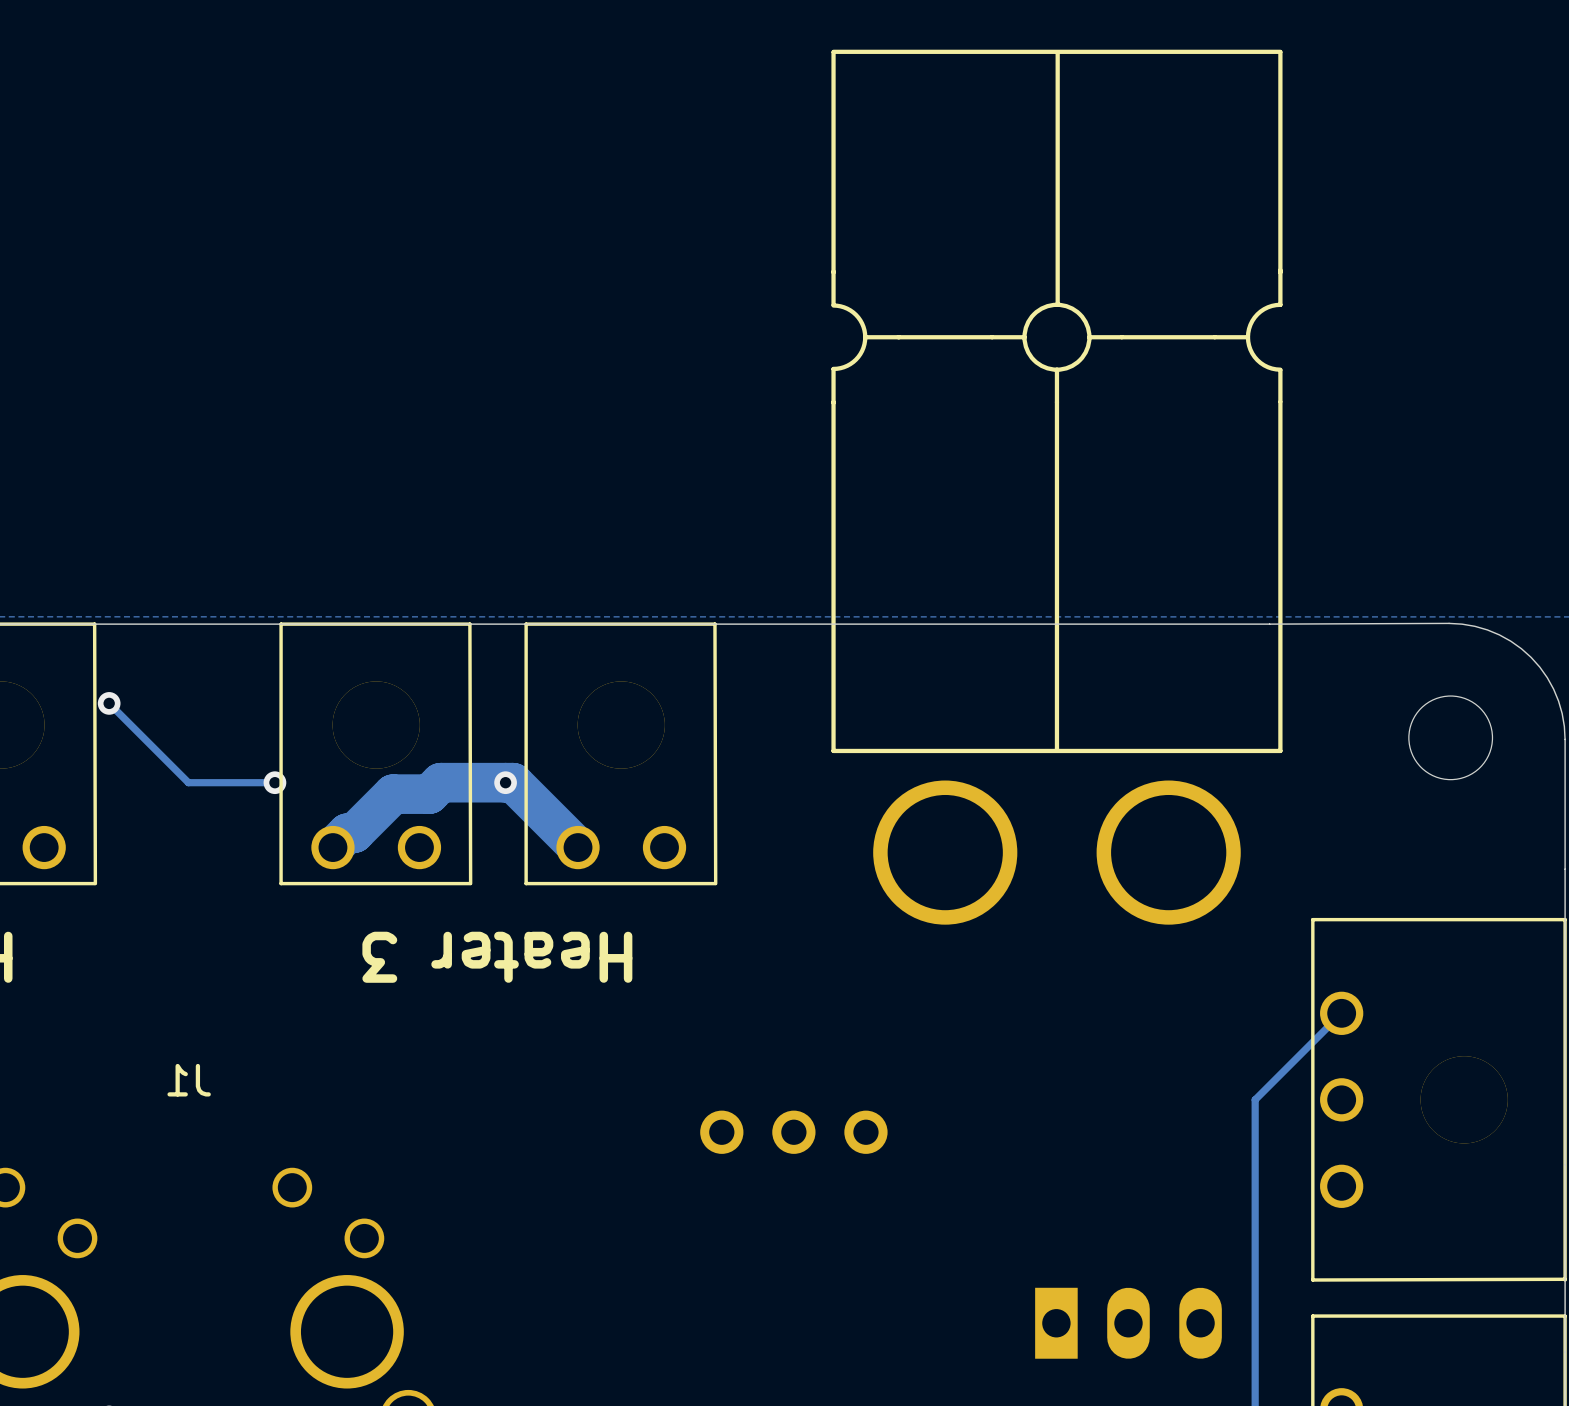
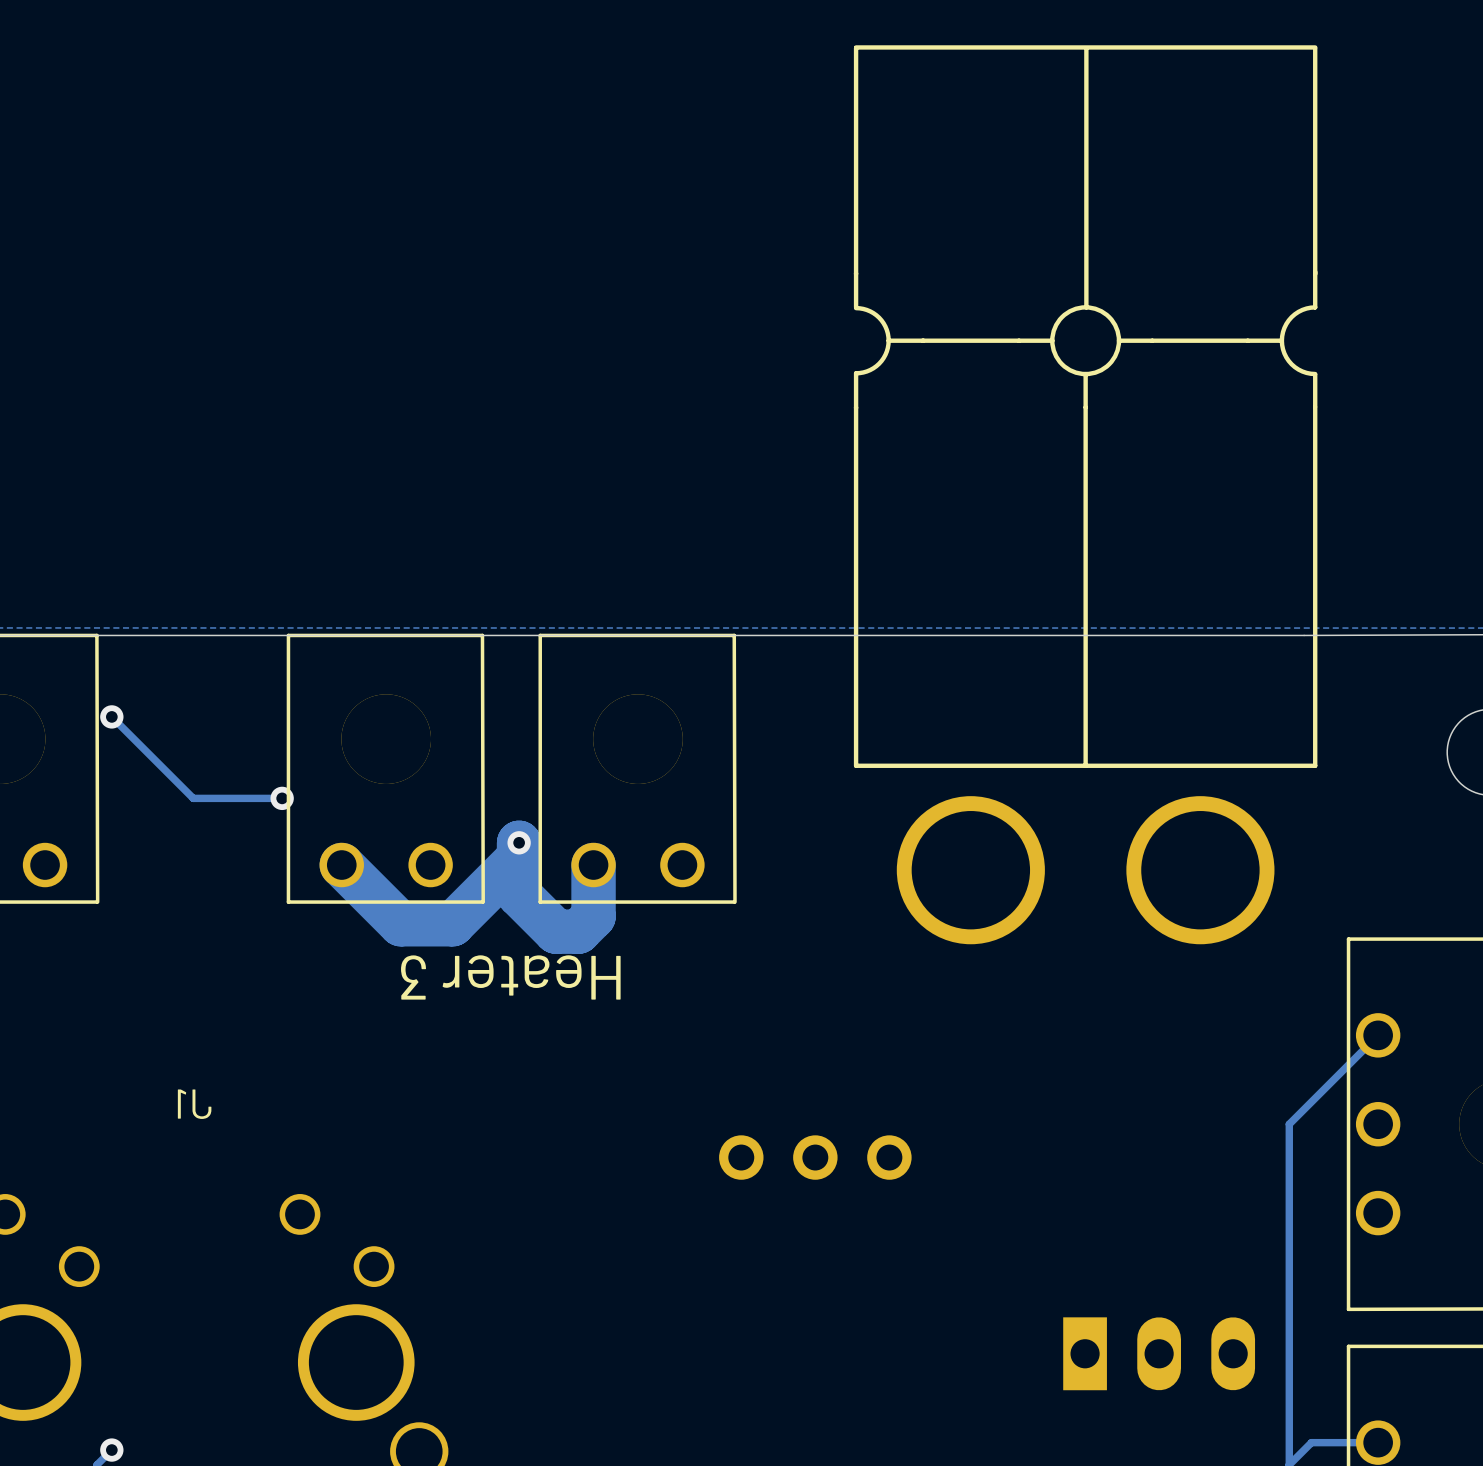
via position: (505, 782) -> (519, 842)
track: none -> (519, 842) (519, 894) (556, 931) (578, 931) (593, 916) (593, 865)
track: (578, 847) (513, 782) (440, 782) (429, 794) (393, 794) (354, 833) (347, 833) (332, 847) -> (519, 857) (452, 924) (401, 924) (341, 865)

